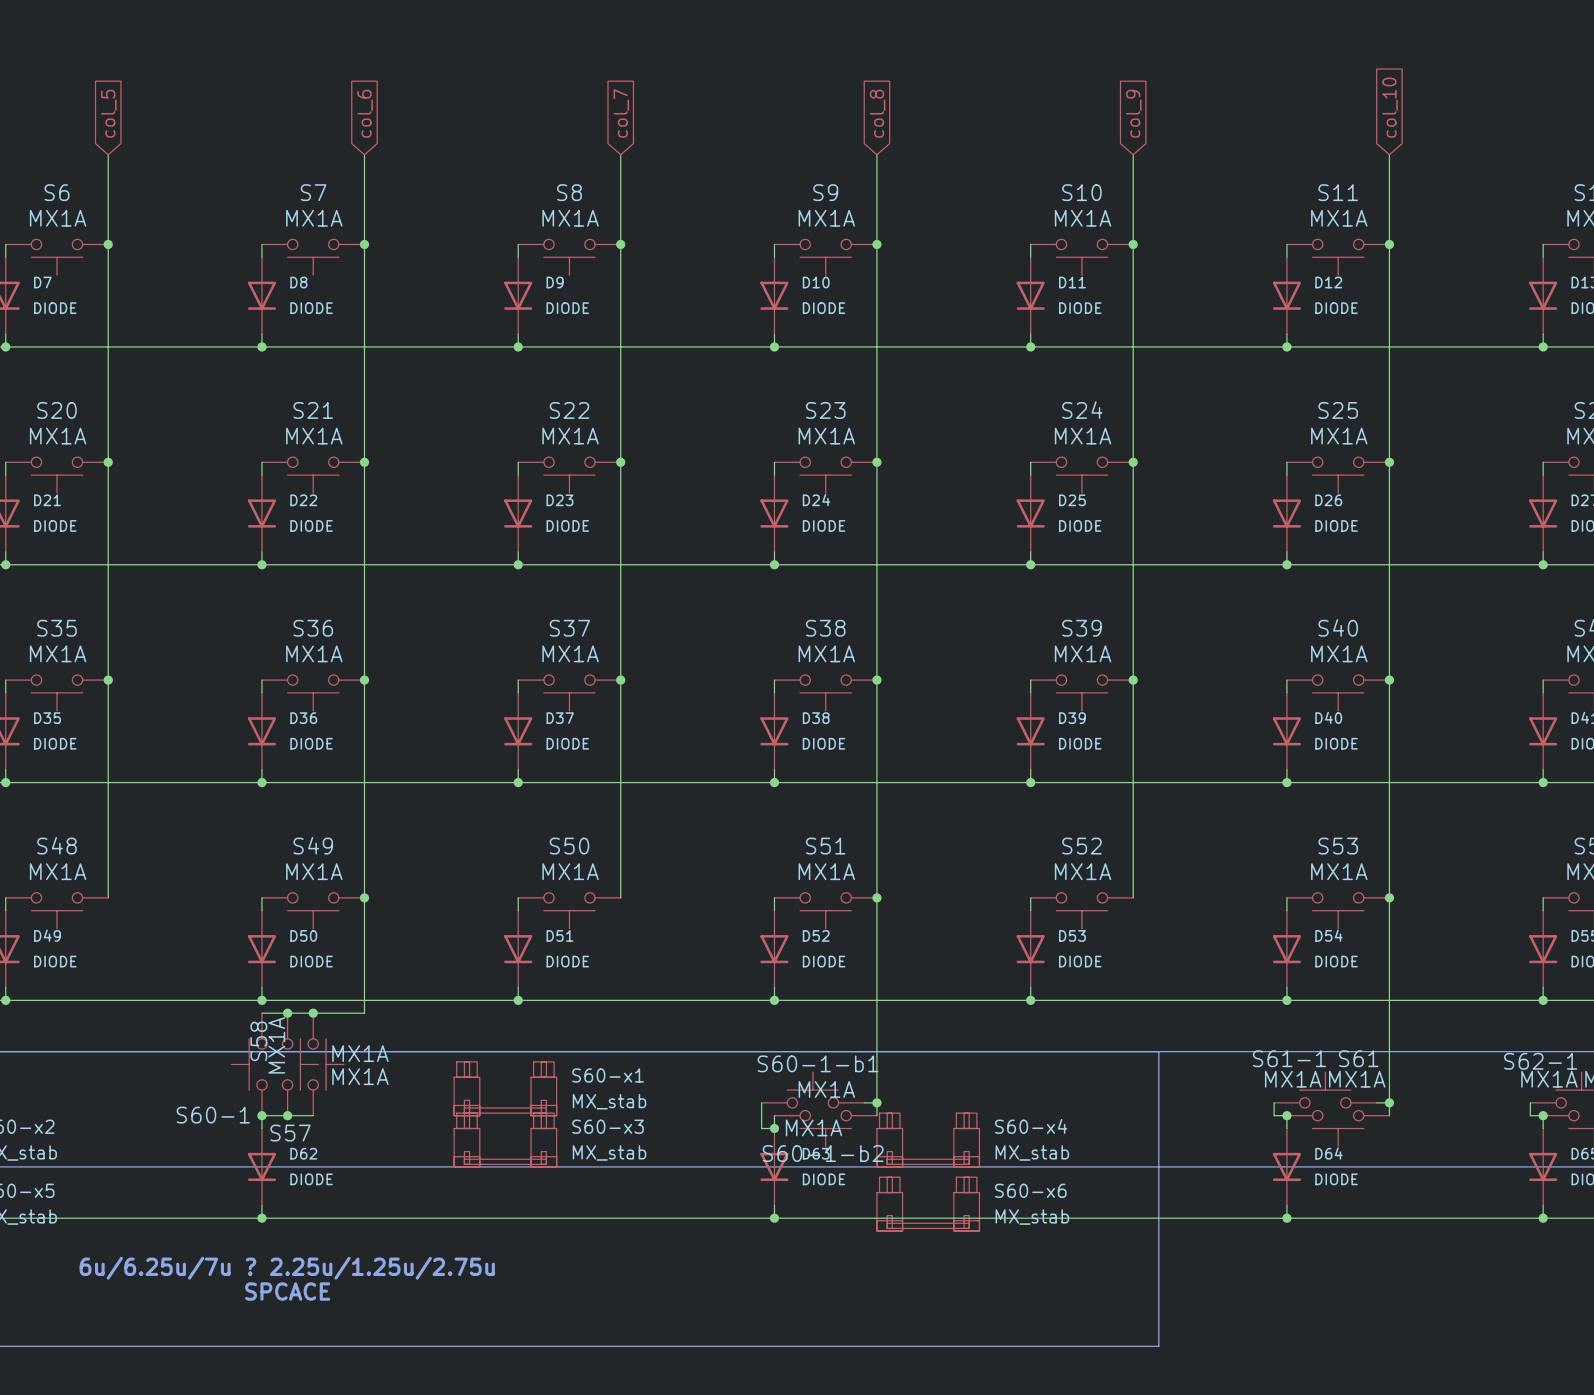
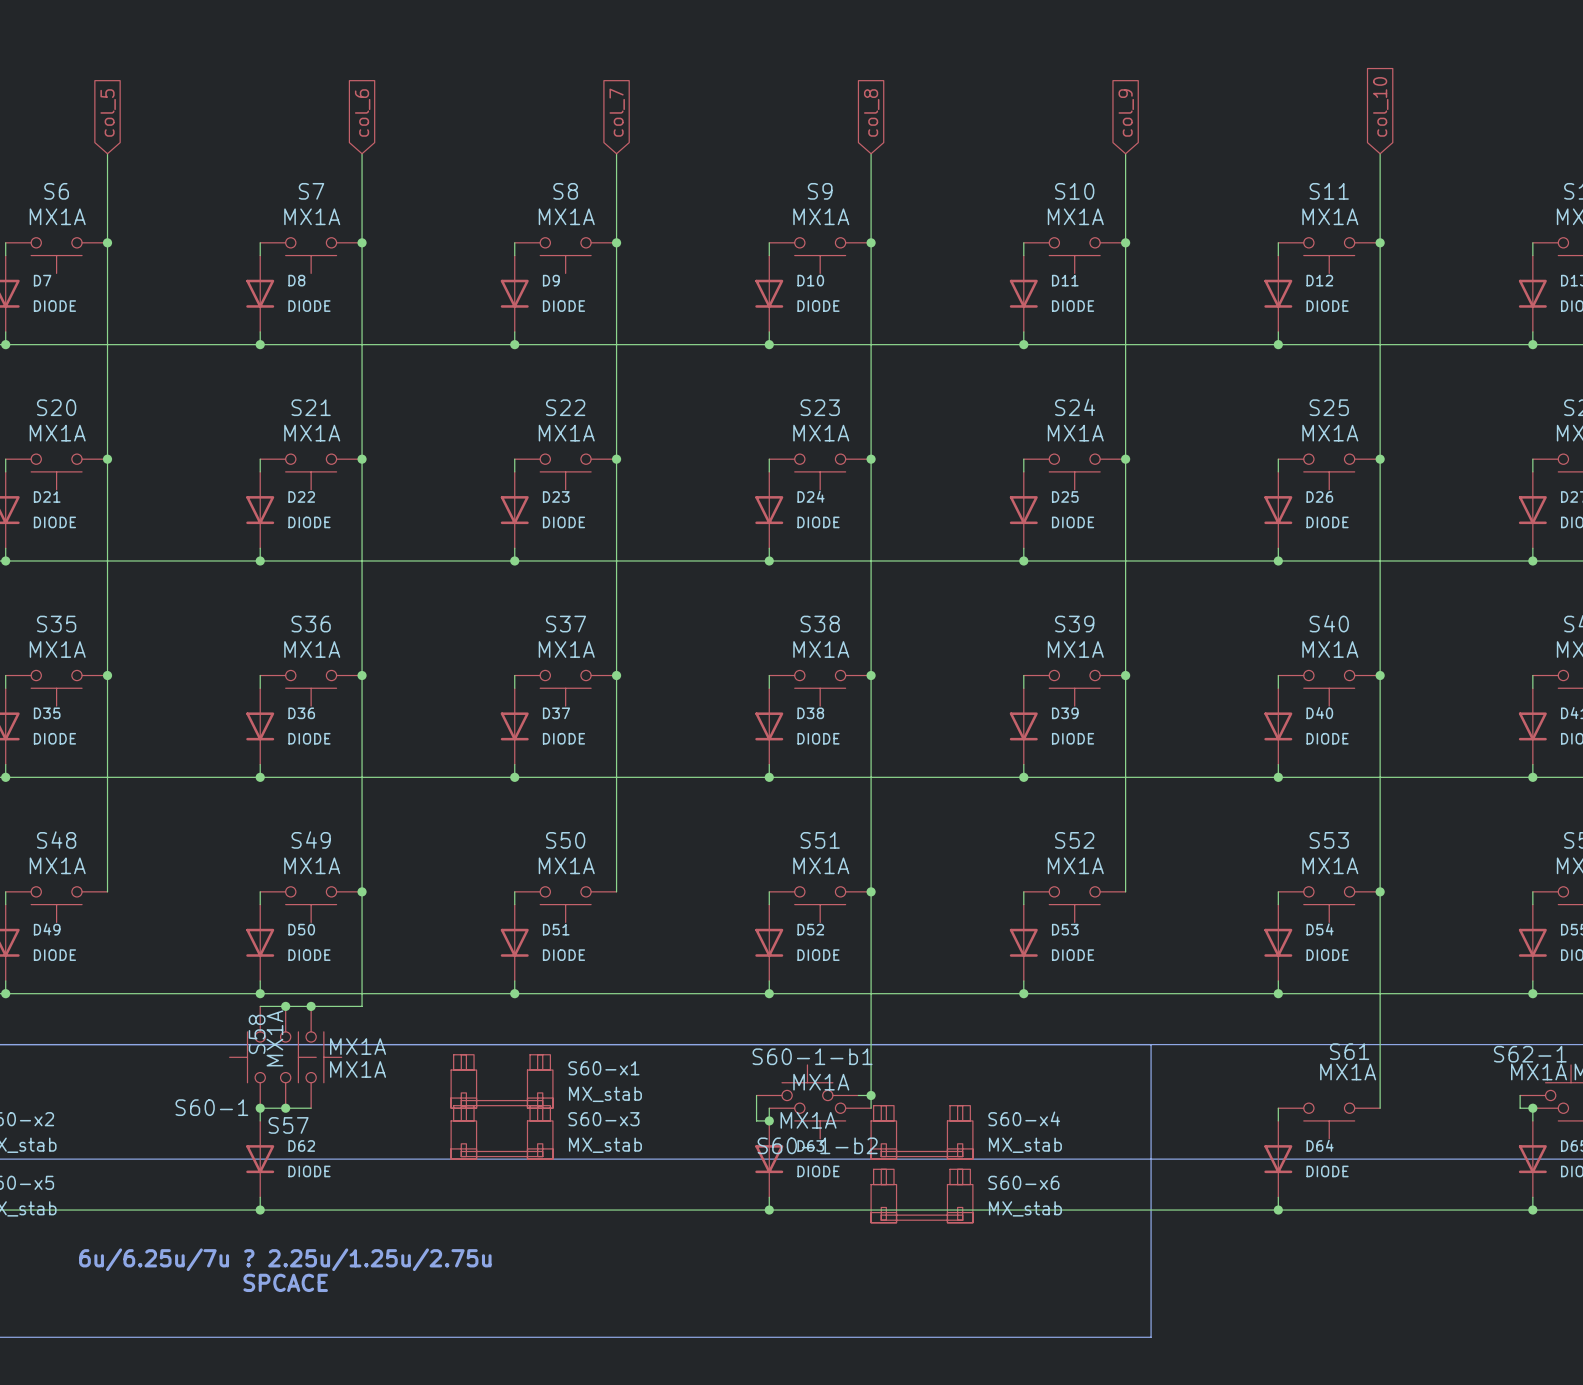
S61-1: MX1A (1325, 1090) -> none
wire: (1274, 1102) (1274, 1115) (1286, 1115) -> none
wire: (1376, 1102) (1389, 1102) -> none
junction: (1389, 1102) -> none
junction: (1286, 1115) -> none

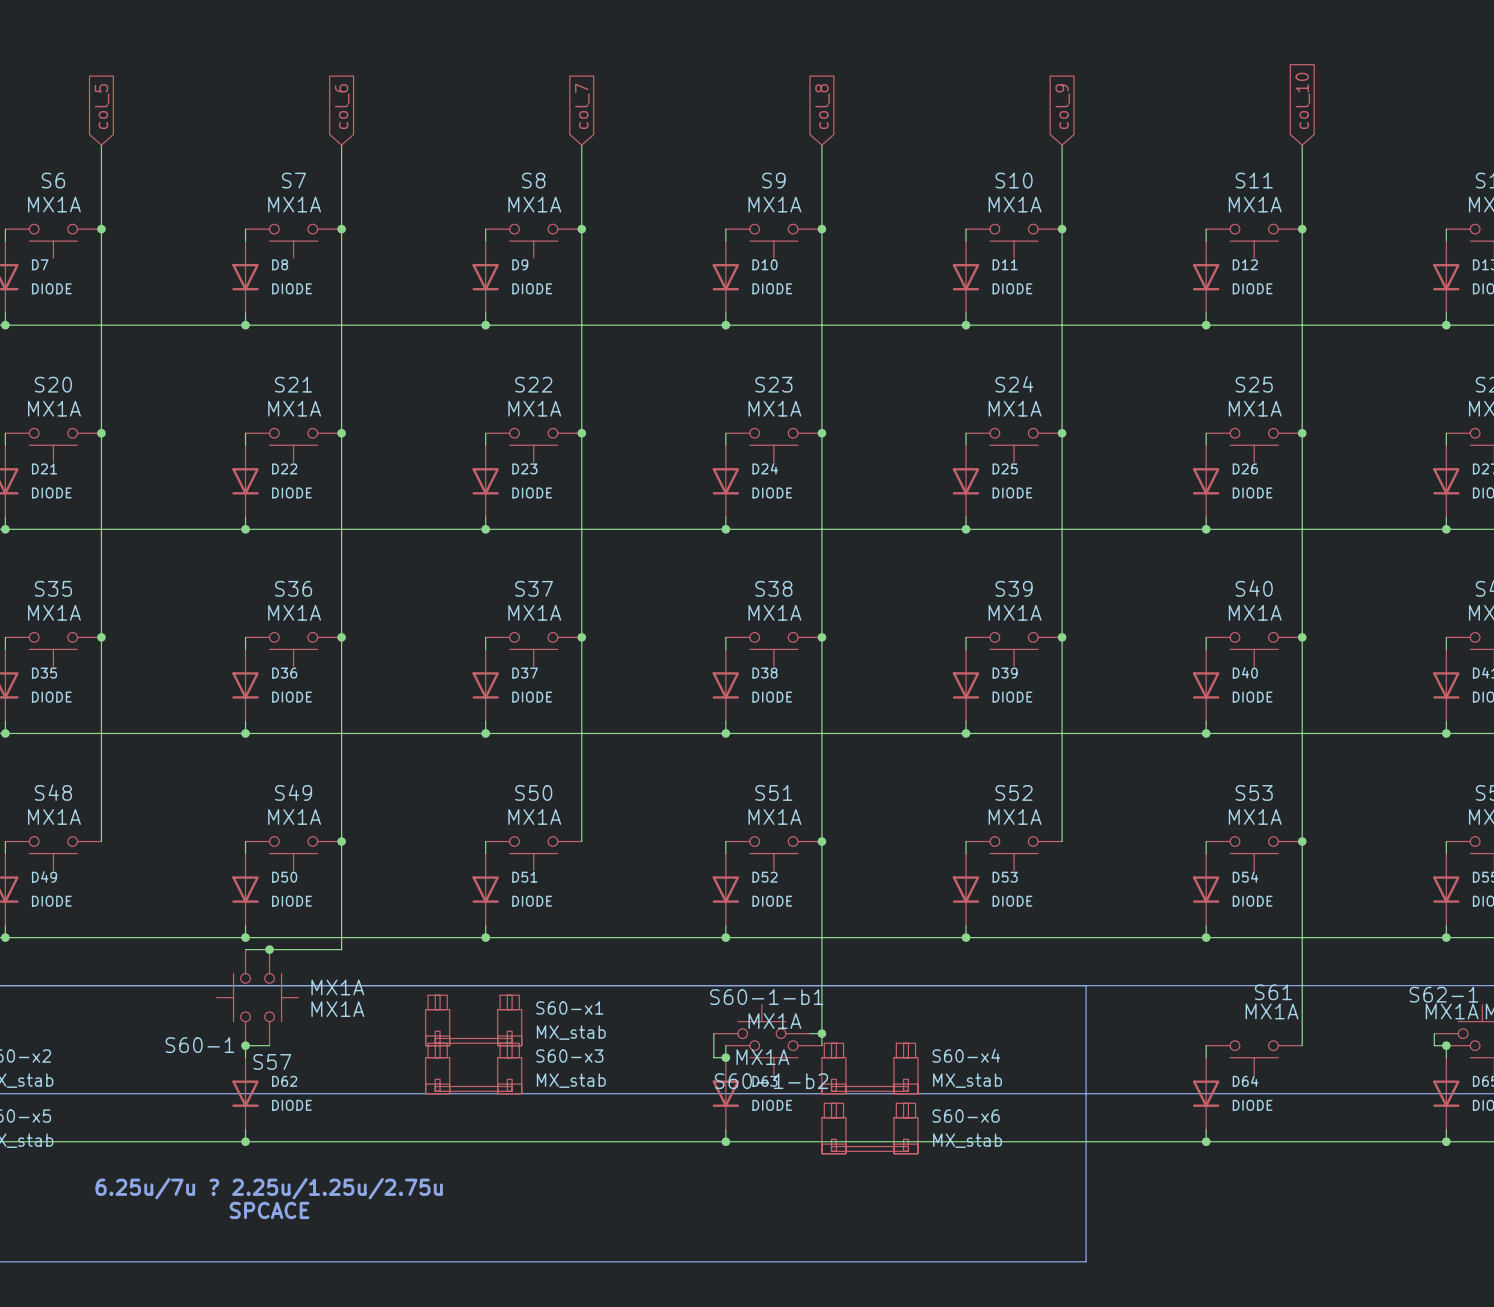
junction: (311, 1006) -> none
S58: MX1A (323, 1057) -> none
wire: (285, 1108) (311, 1108) -> none
junction: (285, 1108) -> none
text: 6u/6.25u/7u ? 2.25u/1.25u/2.75u (285, 1259) -> 6.25u/7u ? 2.25u/1.25u/2.75u (269, 1188)

